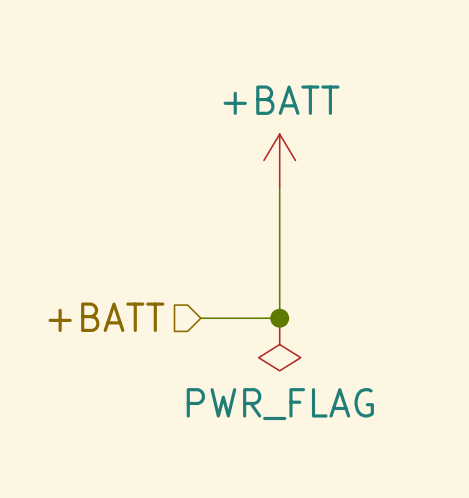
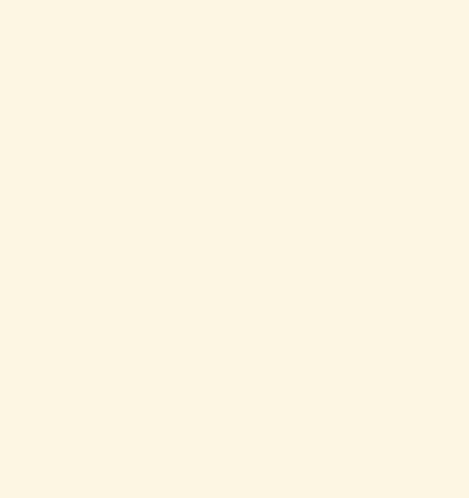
power symbol: +BATT (279, 160) -> none
wire: (279, 186) (279, 318) (200, 318) -> none
hierarchical label: +BATT (106, 317) -> none
junction: (279, 318) -> none
power symbol: PWR_FLAG (279, 344) -> none

